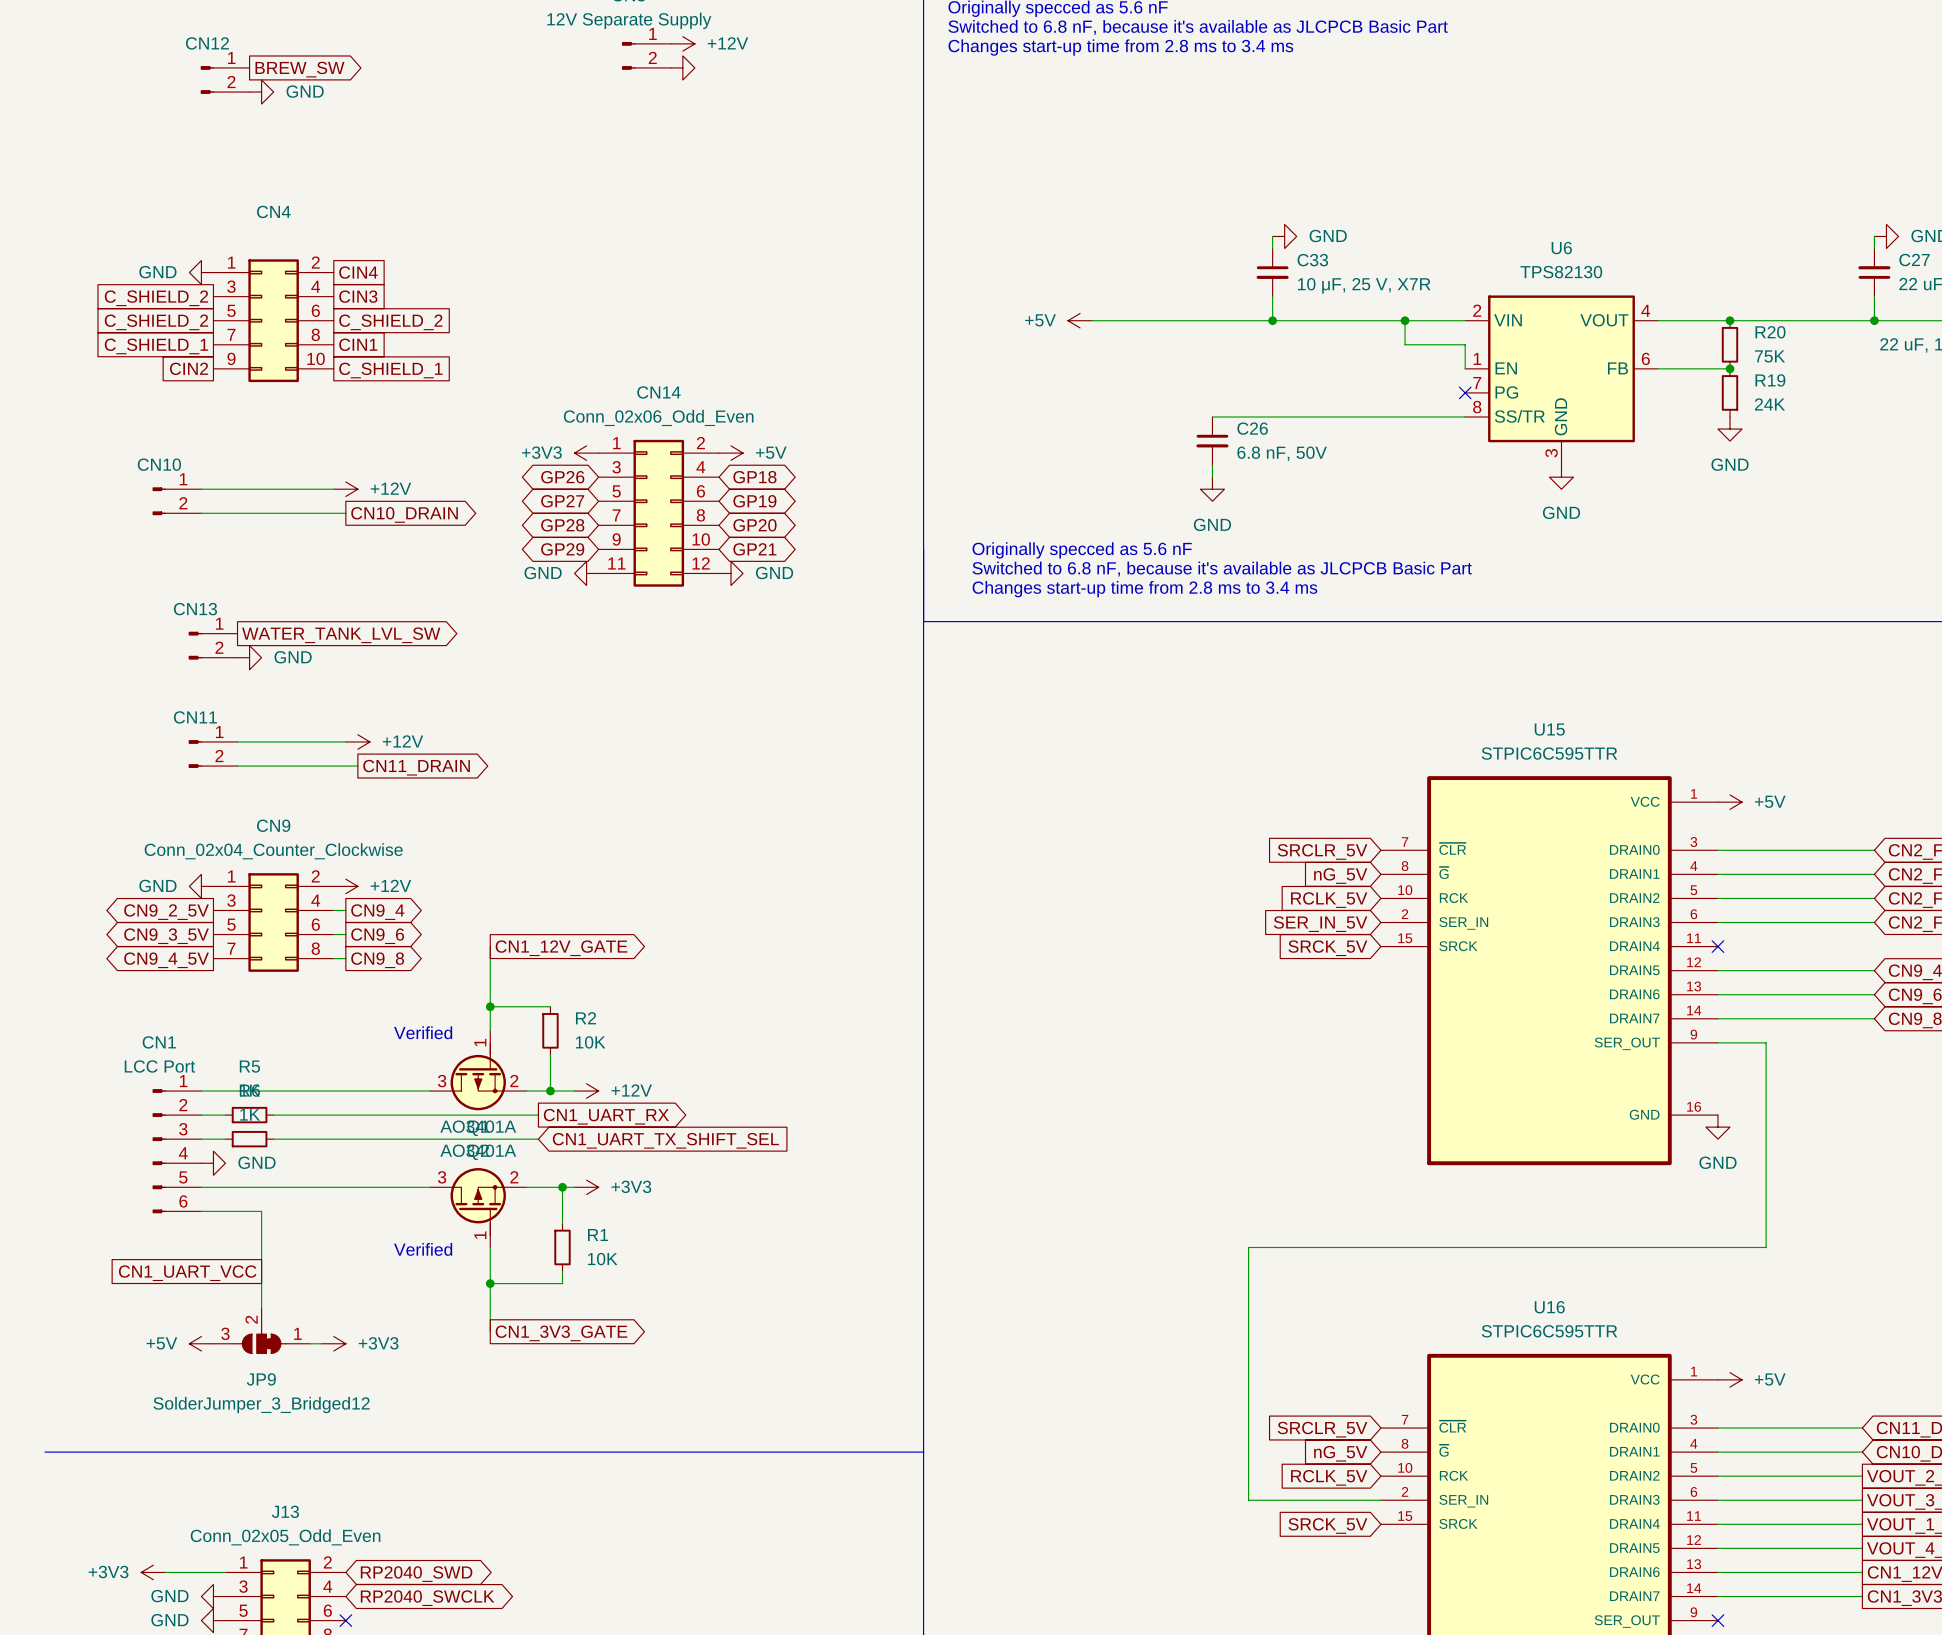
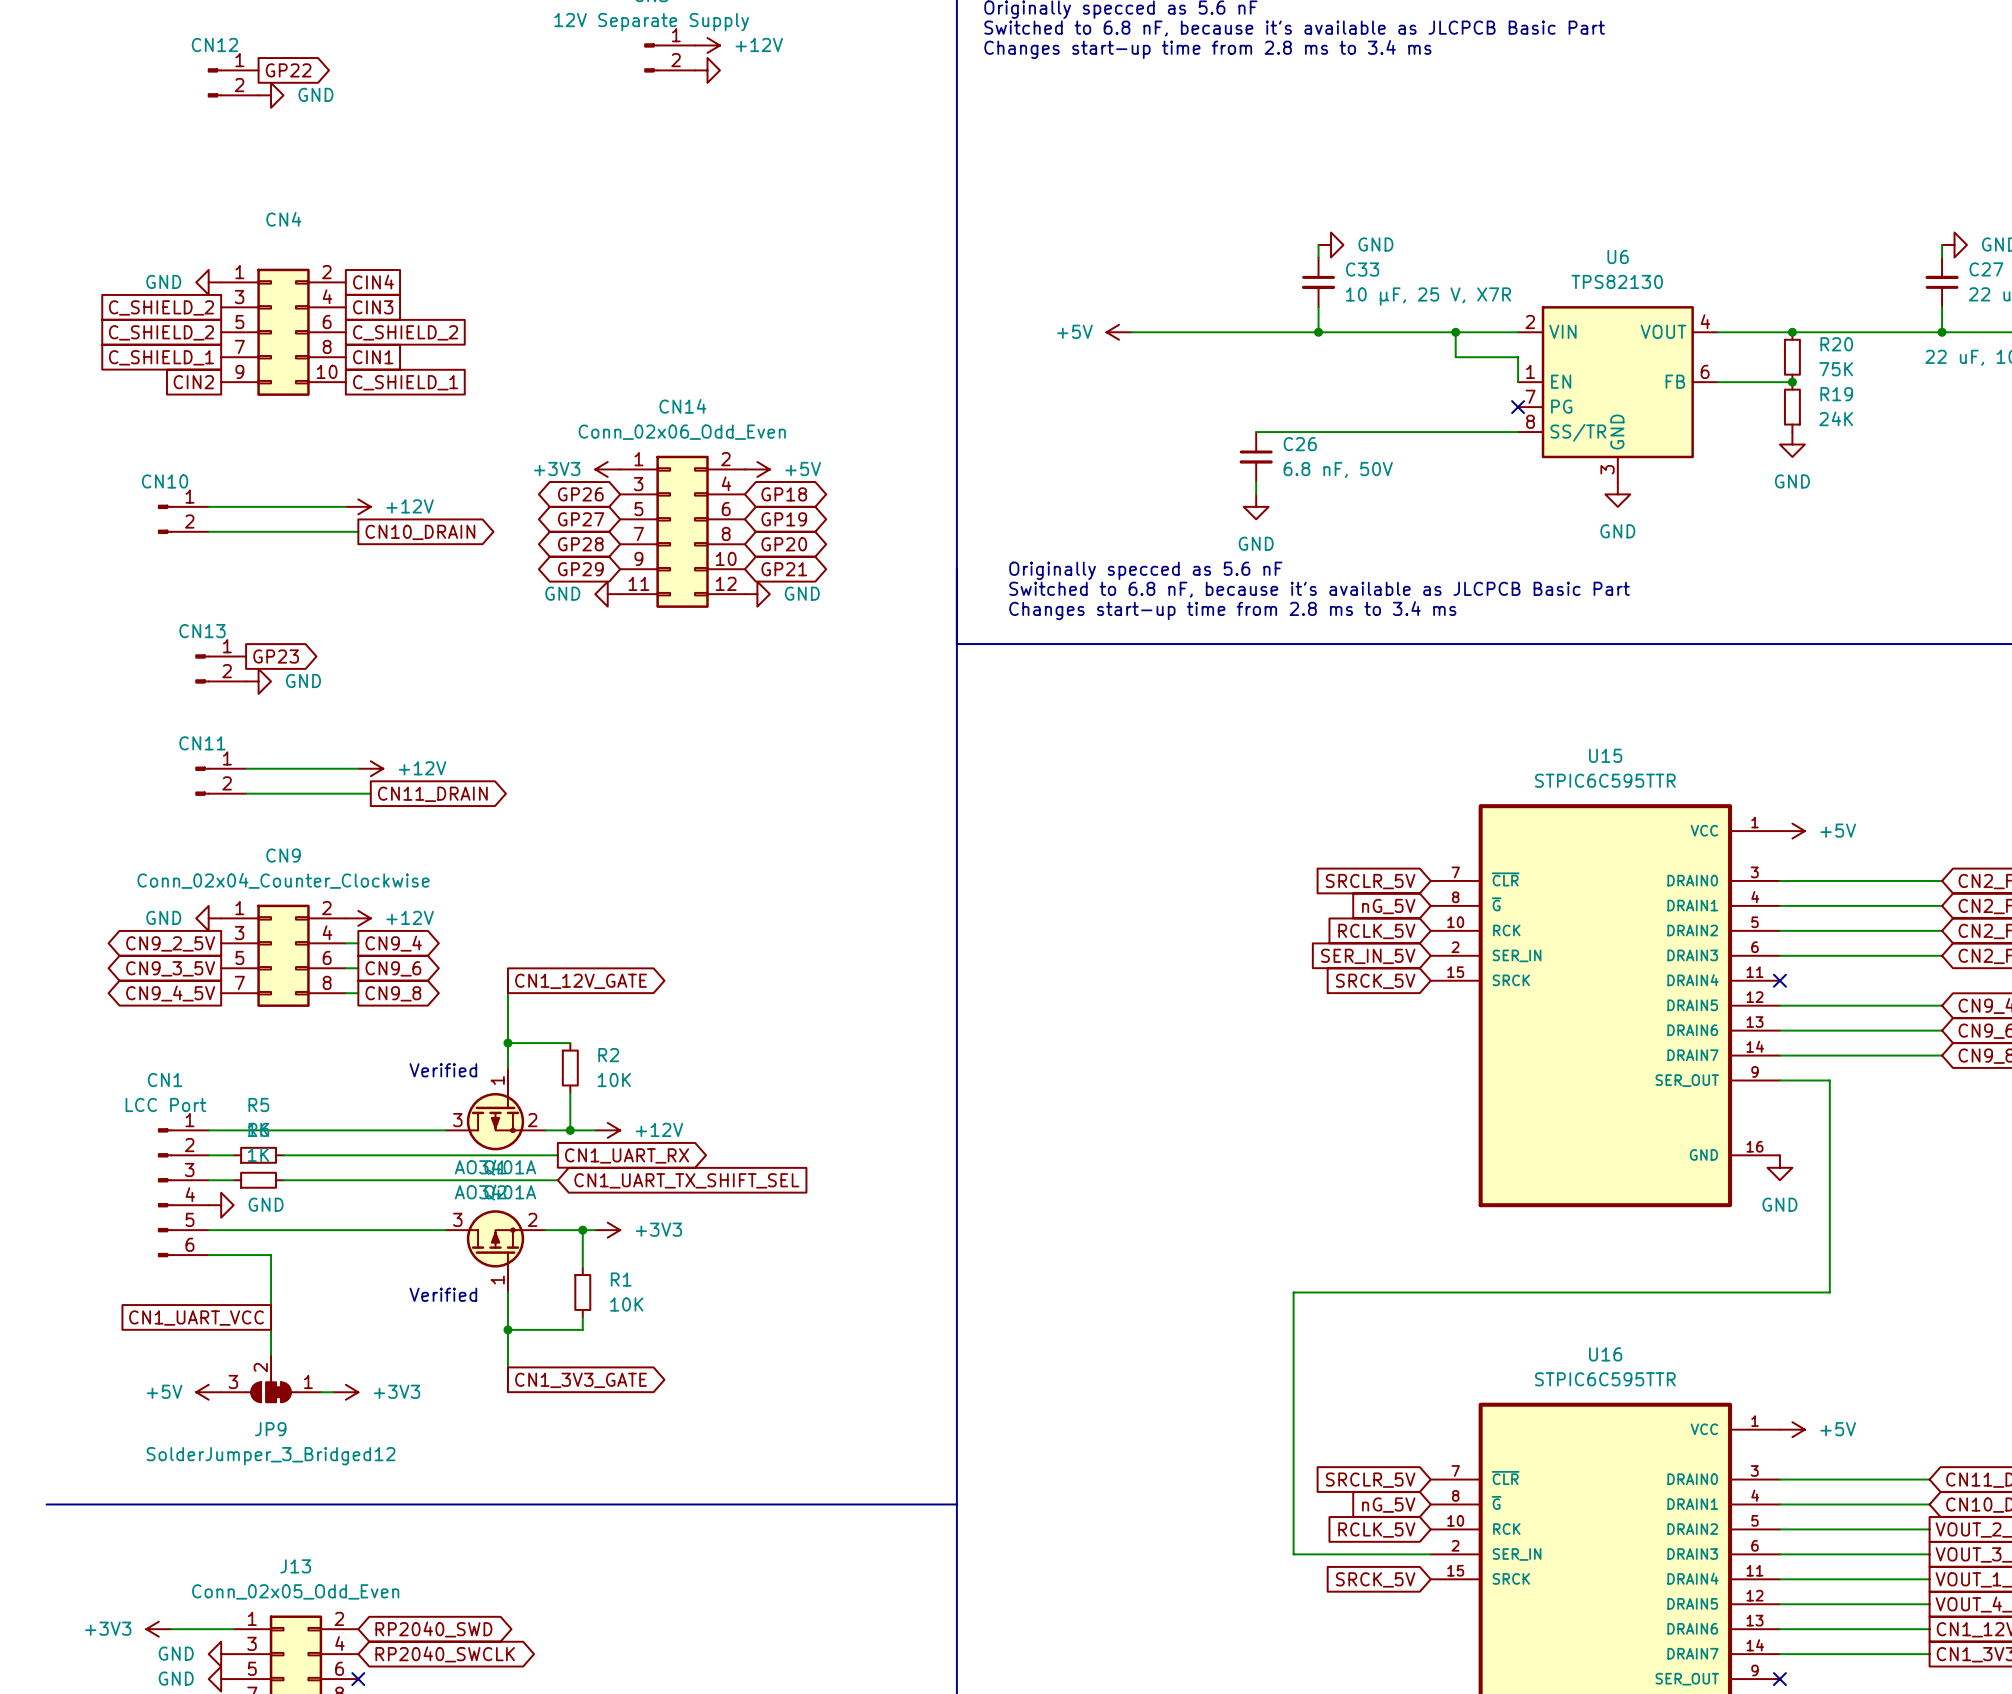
global label: BREW_SW (299, 69) -> GP22 (288, 70)
global label: WATER_TANK_LVL_SW (341, 635) -> GP23 (276, 656)

